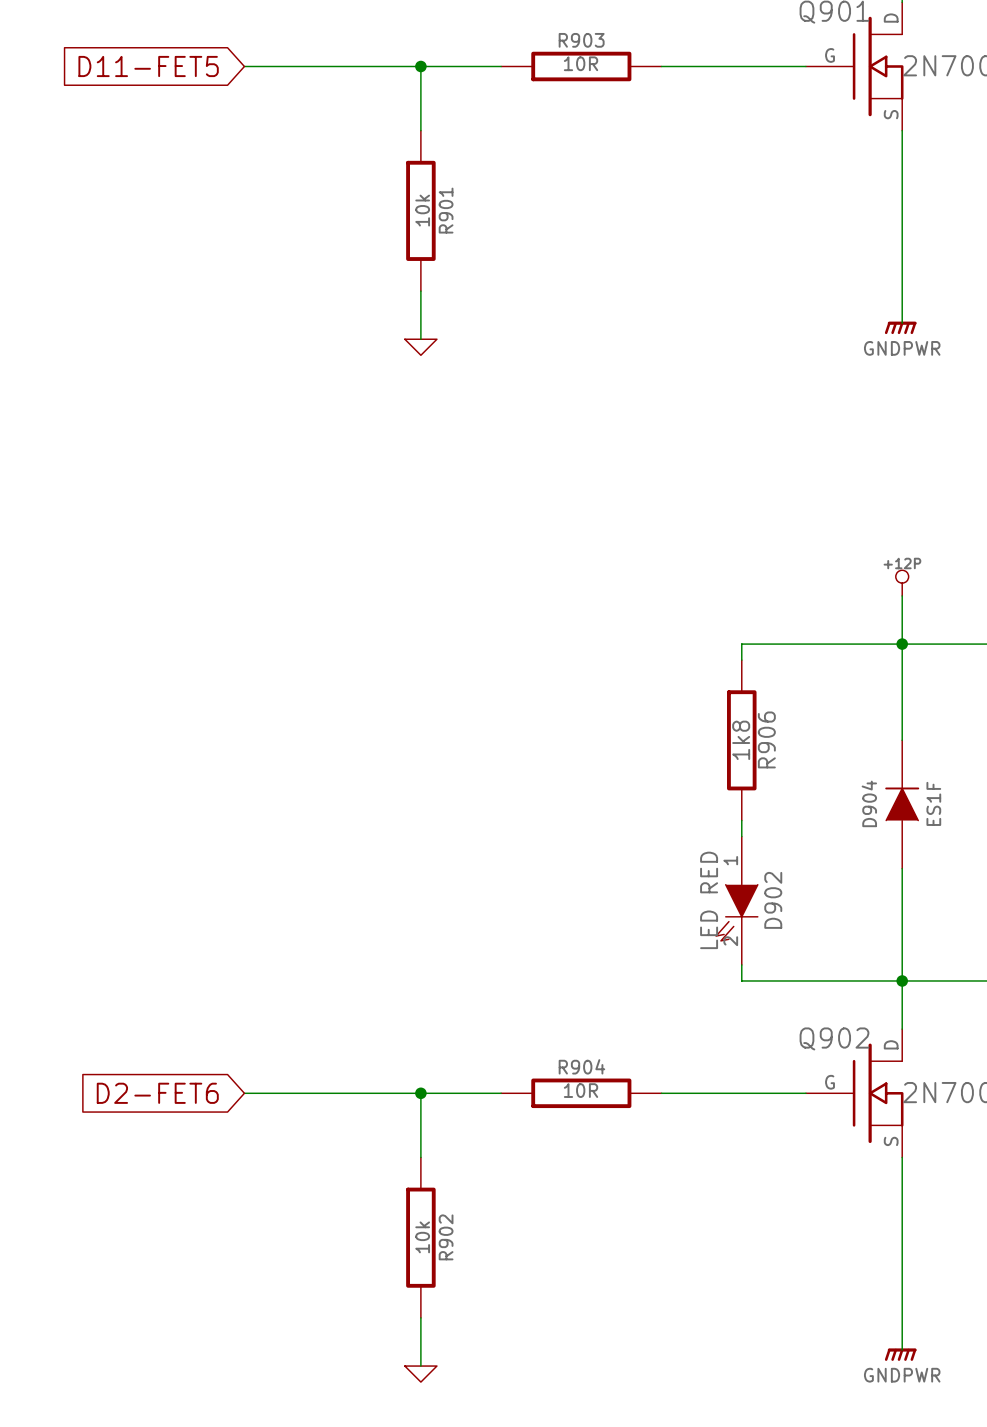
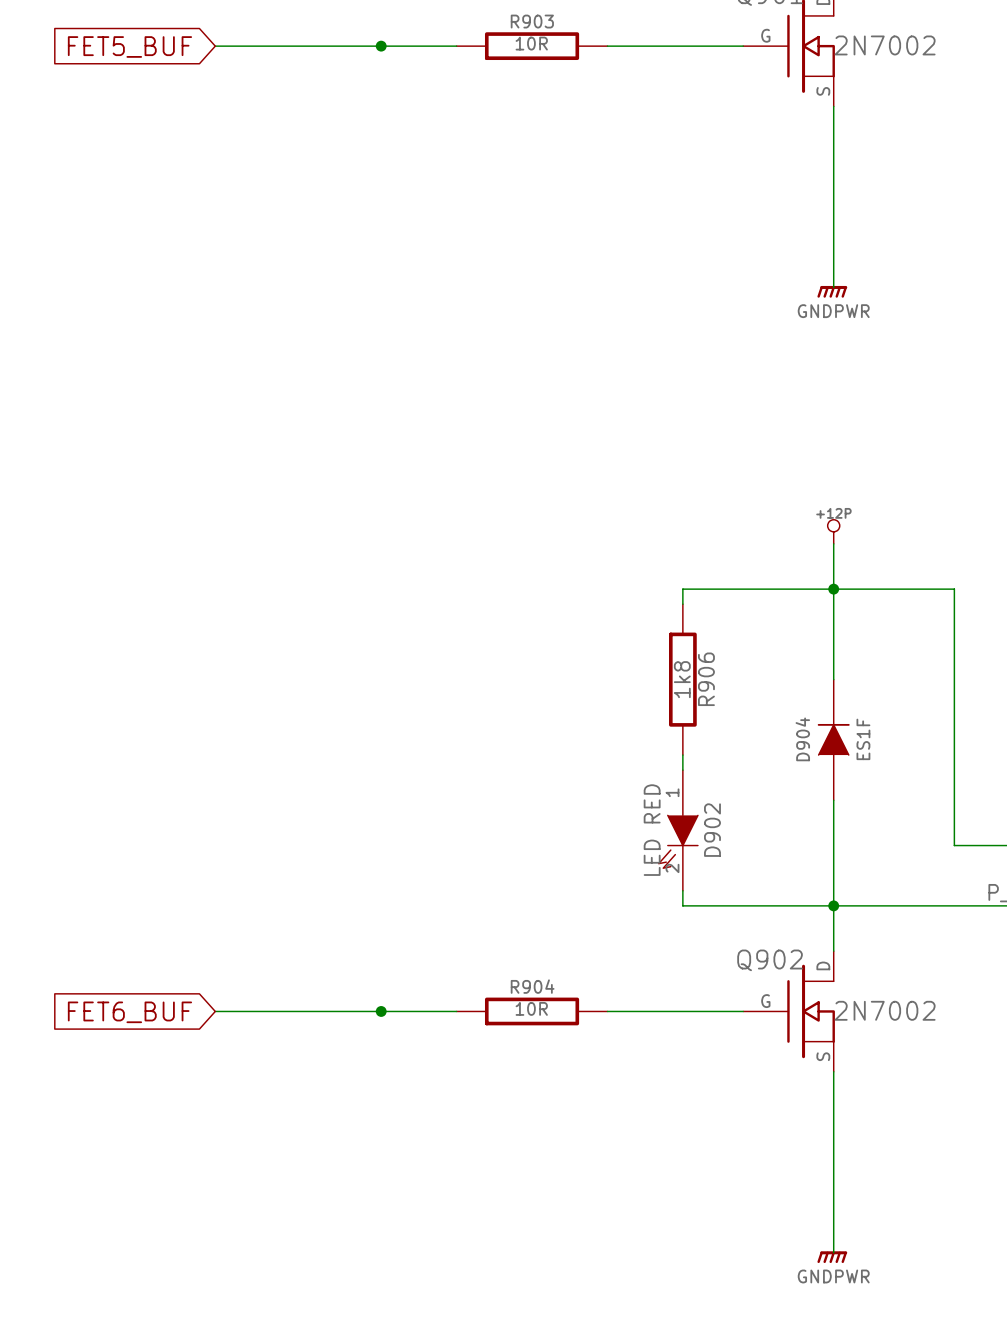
global label: D11-FET5 (148, 66) -> FET5_BUF (129, 46)
wire: (420, 66) (420, 130) -> none
R901: 10k (420, 210) -> none
wire: (420, 291) (420, 339) -> none
power symbol: (420, 347) -> none
global label: D2-FET6 (157, 1093) -> FET6_BUF (129, 1012)
wire: (420, 1093) (420, 1157) -> none
R902: 10k (420, 1237) -> none
wire: (420, 1317) (420, 1366) -> none
power symbol: (420, 1374) -> none

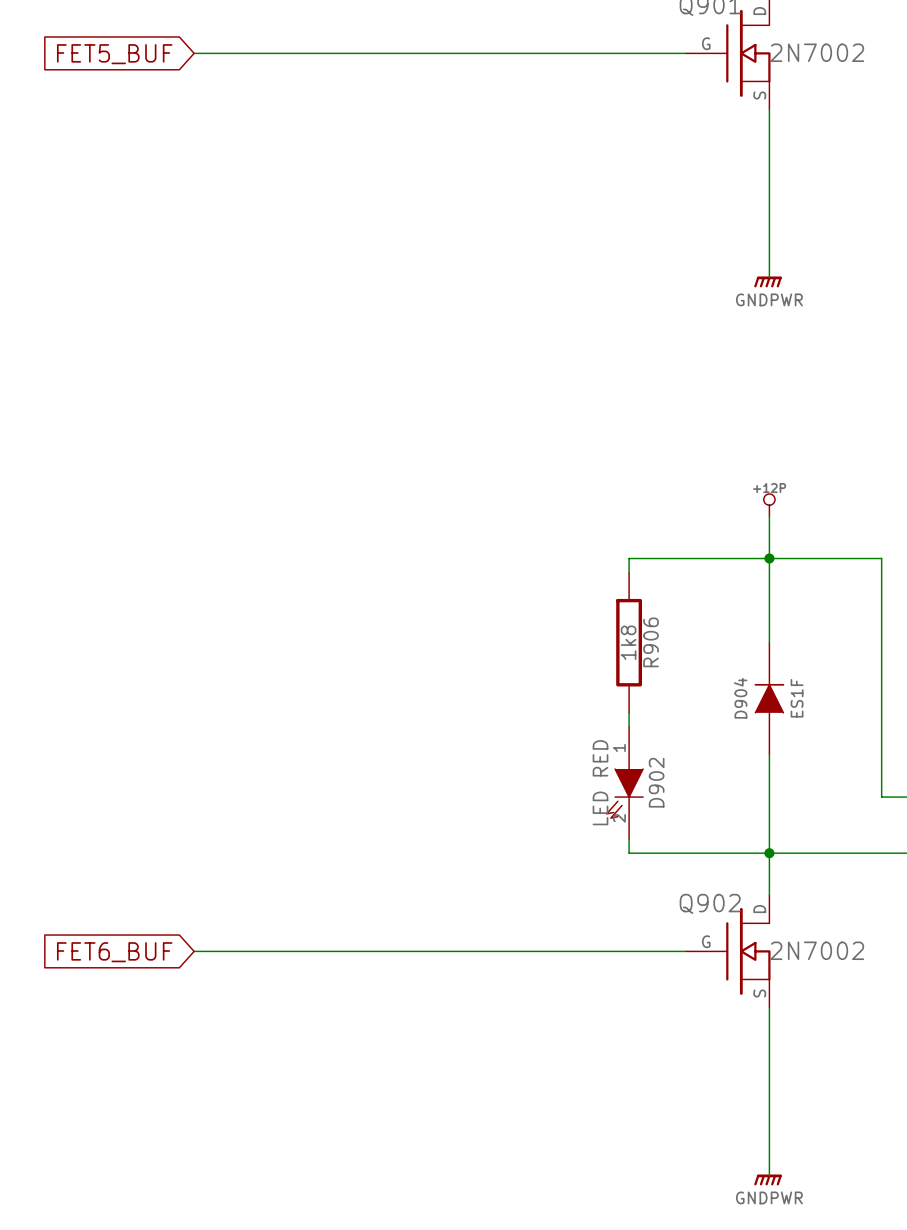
junction: (381, 46) -> none
wire: none -> (418, 53) (558, 53)
R903: 10R (532, 46) -> none
junction: (381, 1011) -> none
wire: none -> (418, 951) (558, 951)
R904: 10R (532, 1011) -> none

